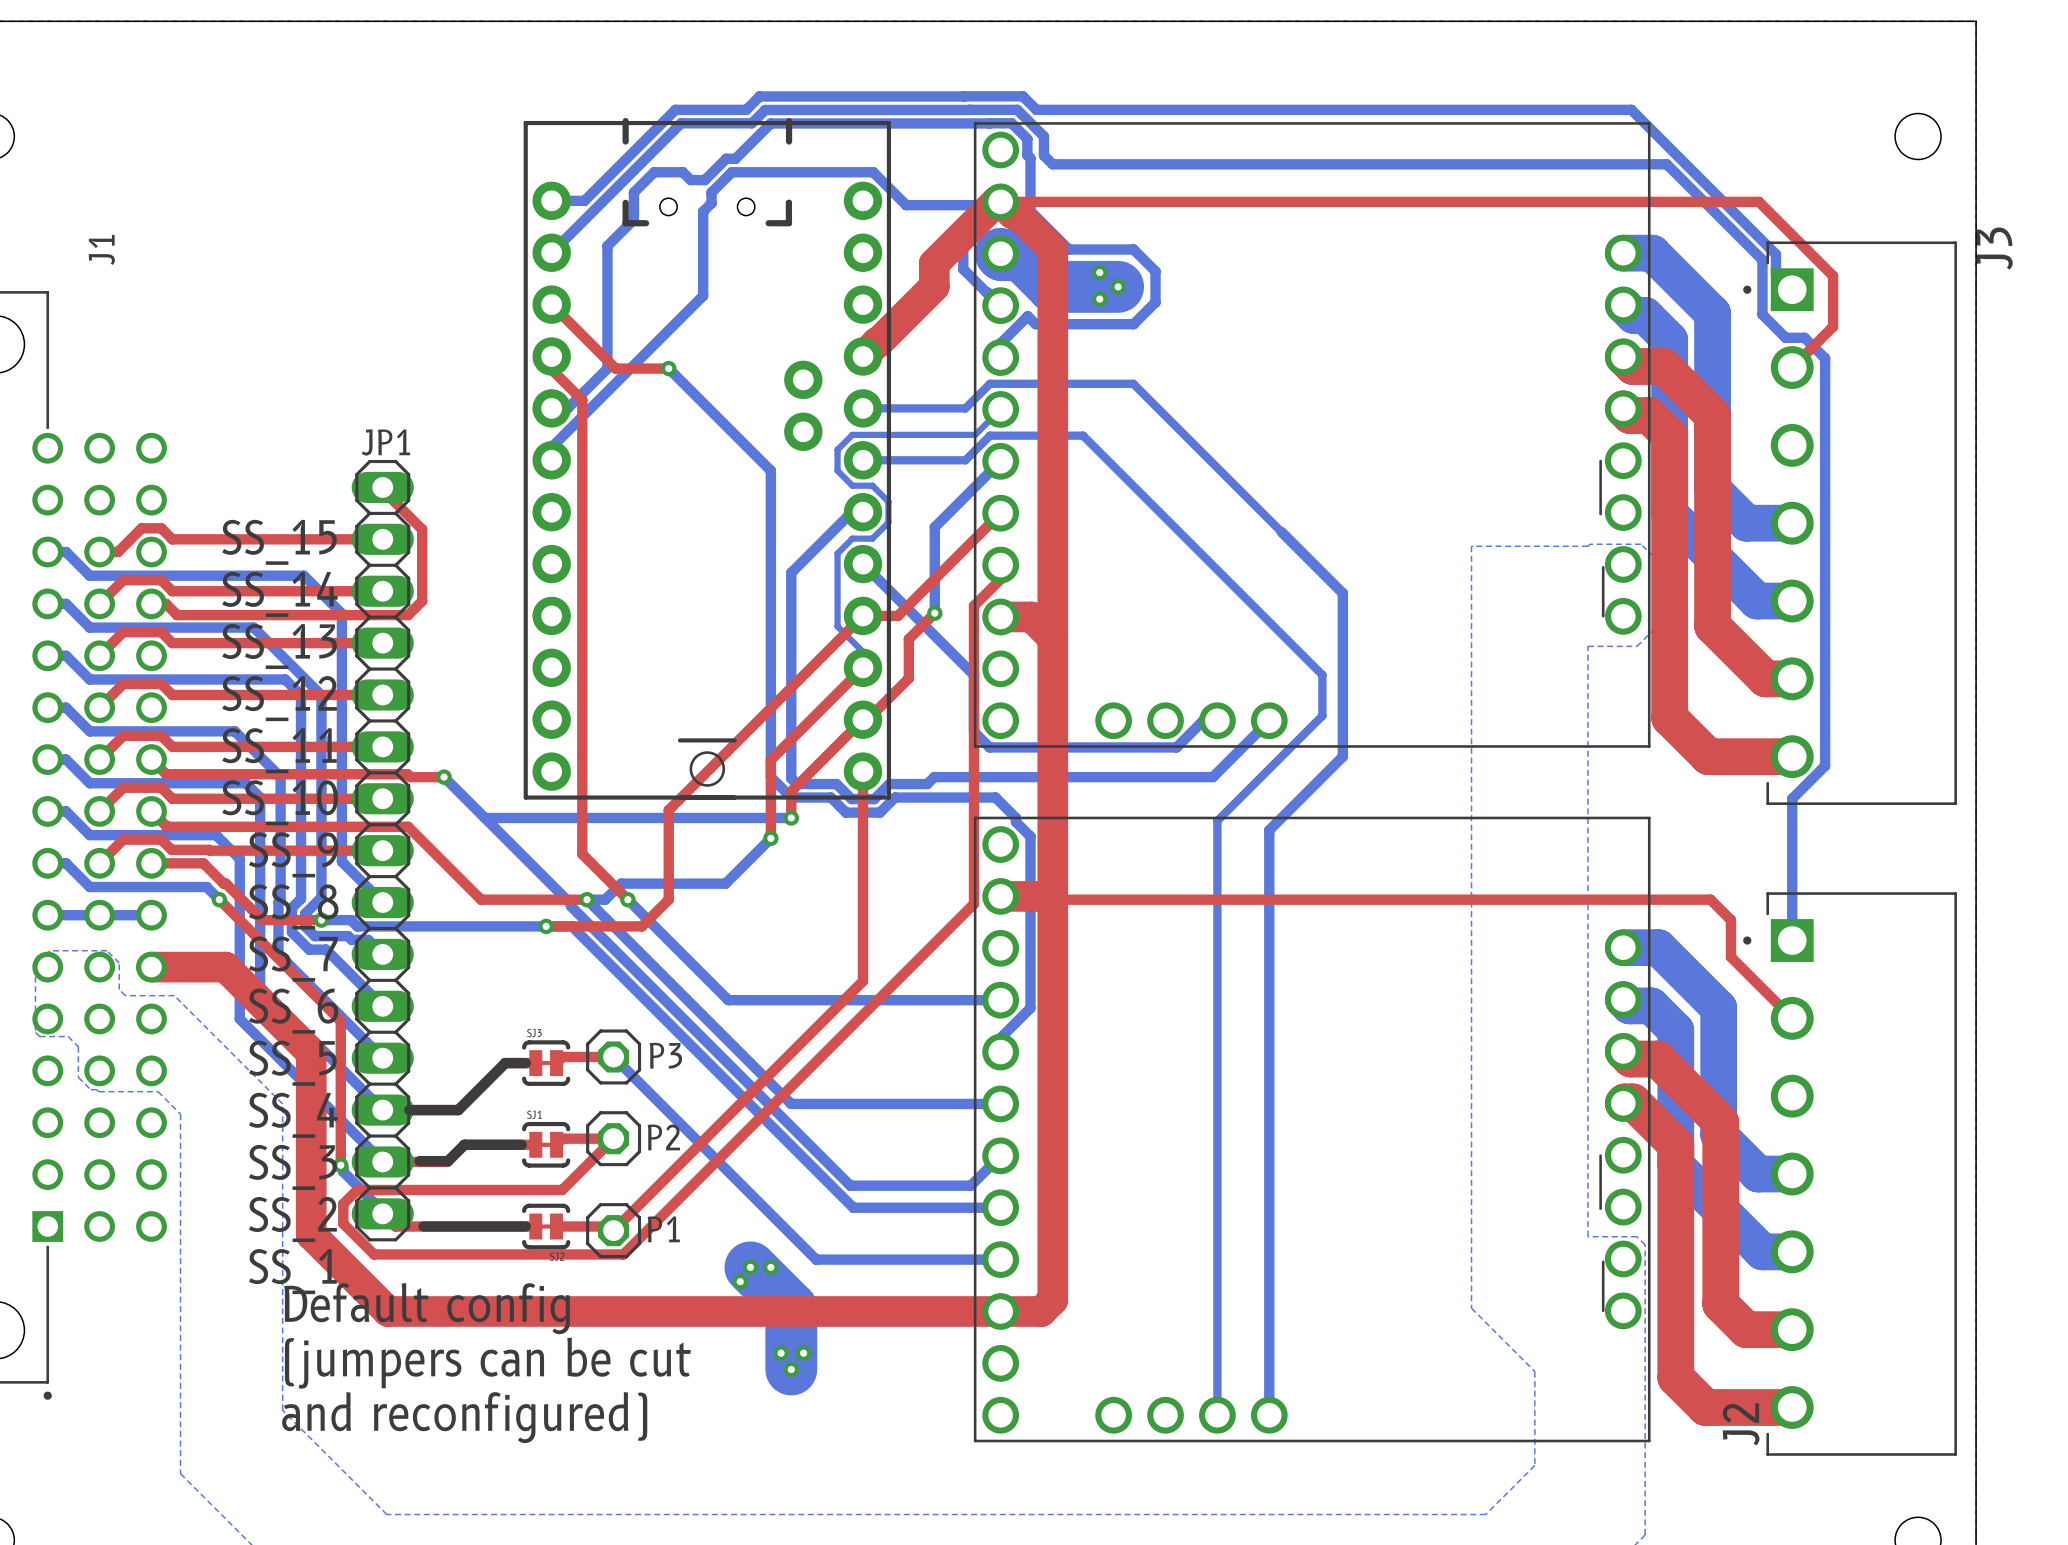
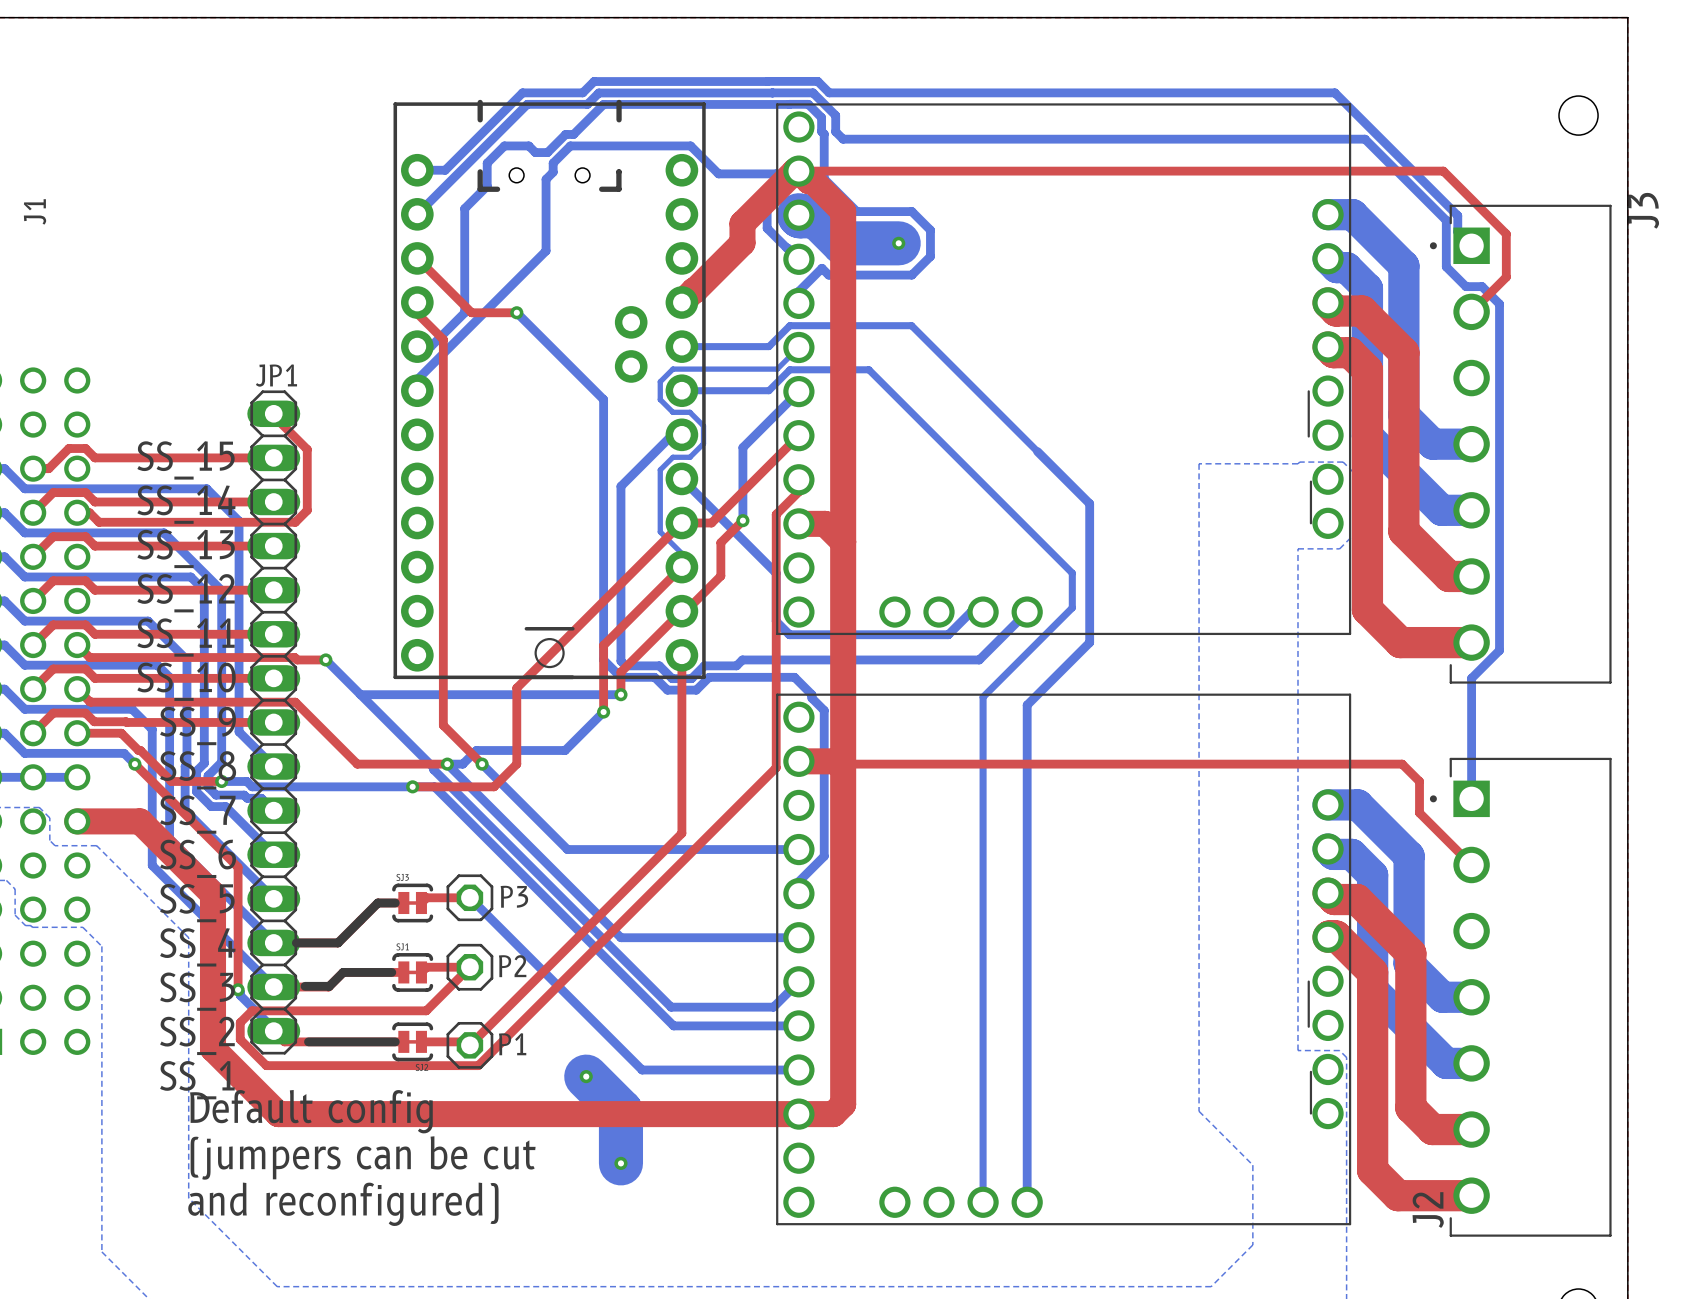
via: (1099, 272) -> none
via: (1099, 299) -> none
via: (770, 1267) -> none
via: (740, 1281) -> none
via: (781, 1353) -> none
via: (803, 1353) -> none

